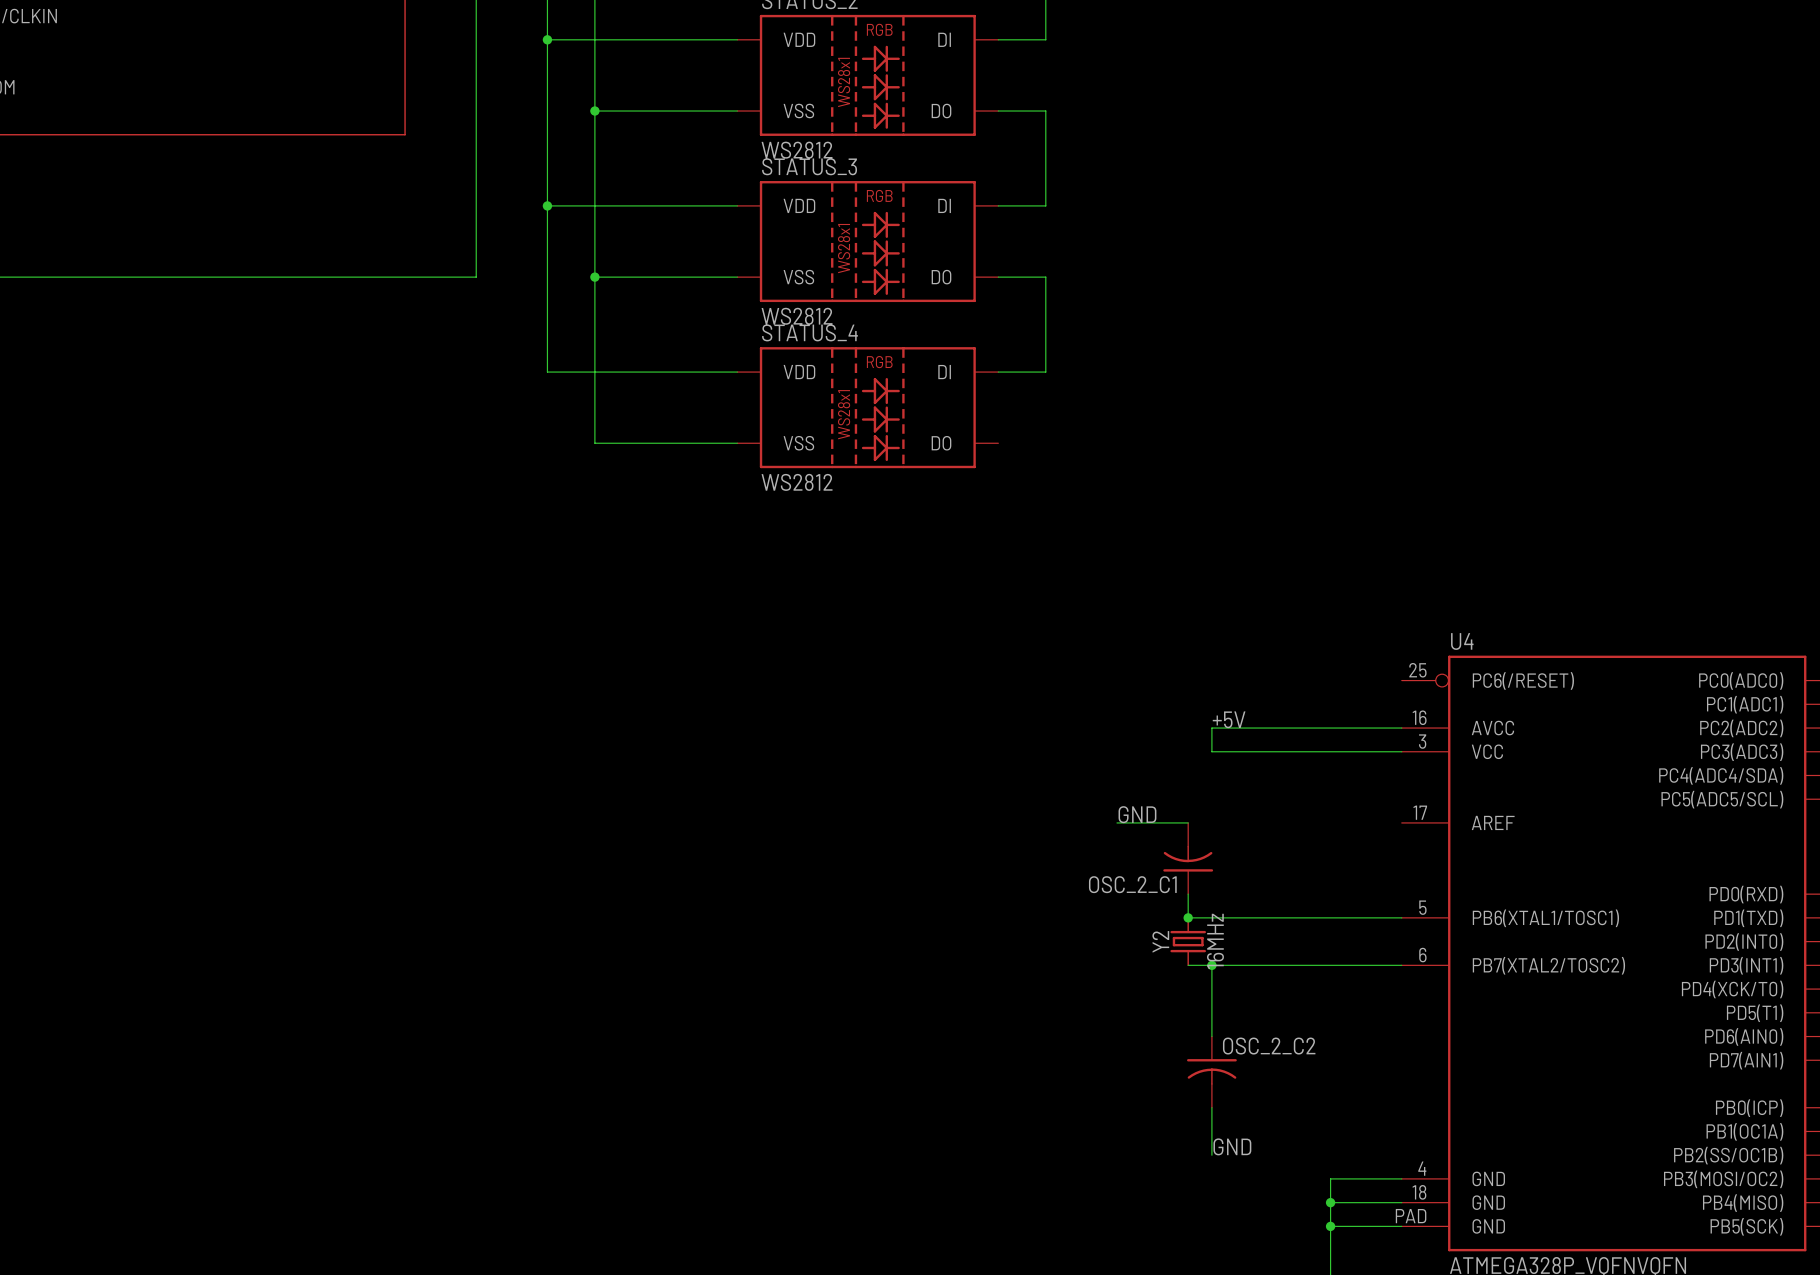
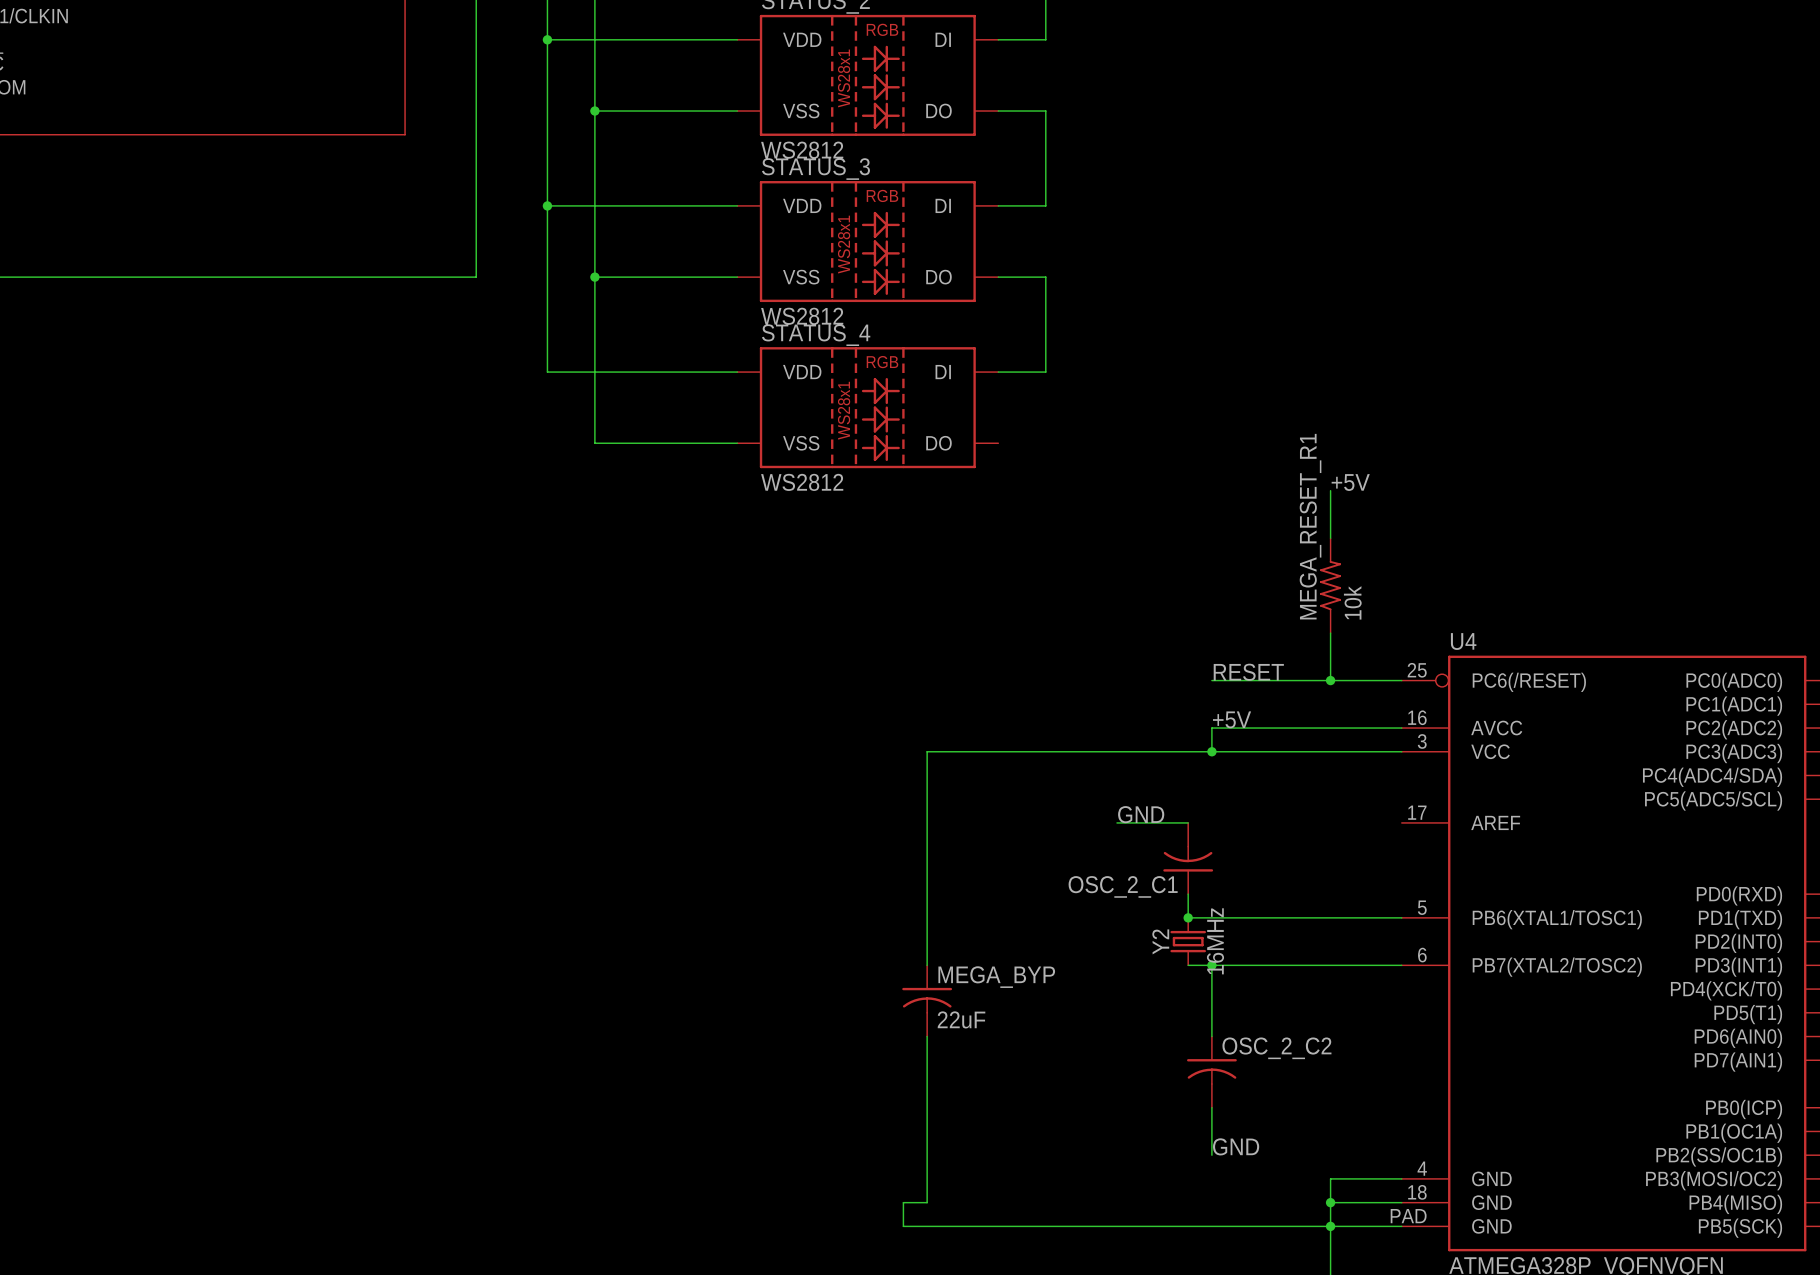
label: none -> +5V (1350, 482)
wire: none -> (1330, 490) (1330, 538)
MEGA_RESET_R1: none -> 10k (1330, 585)
wire: none -> (1330, 633) (1330, 680)
label: none -> RESET (1248, 672)
wire: none -> (1211, 680) (1401, 680)
junction: none -> (1330, 680)
wire: none -> (1211, 751) (927, 751) (927, 965)
junction: none -> (1211, 751)
MEGA_BYP: none -> 22uF (927, 1000)
wire: none -> (927, 1036) (927, 1202) (903, 1202) (903, 1226) (1330, 1226)

